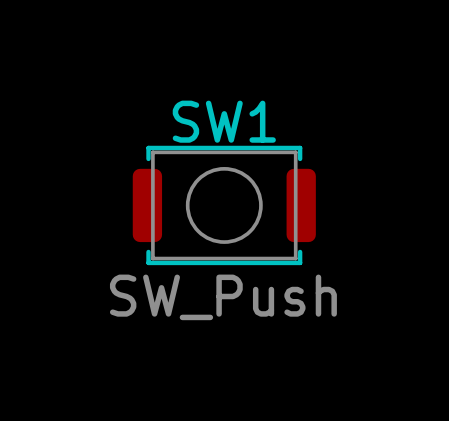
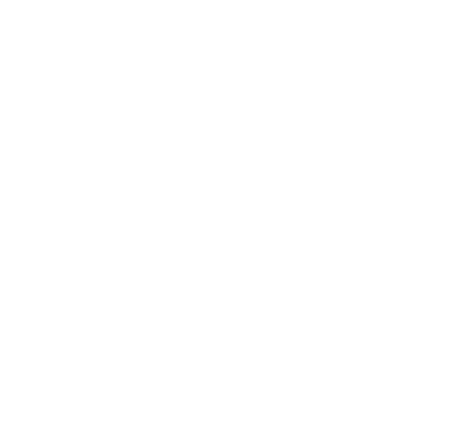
SW1: SW_Push (224, 205) -> none

